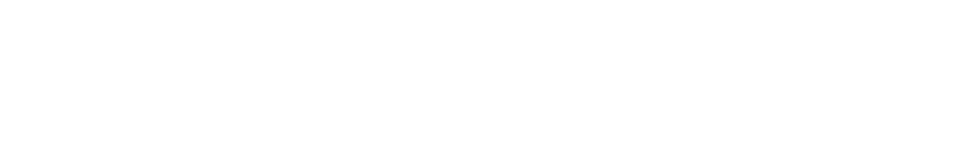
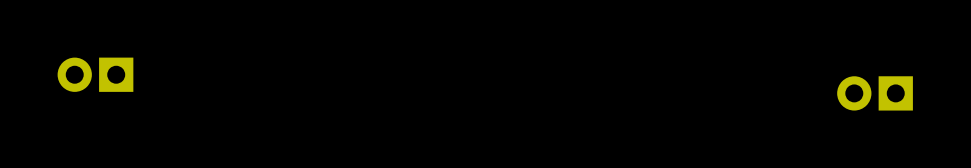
part: none -> (95, 74)
part: none -> (875, 93)

